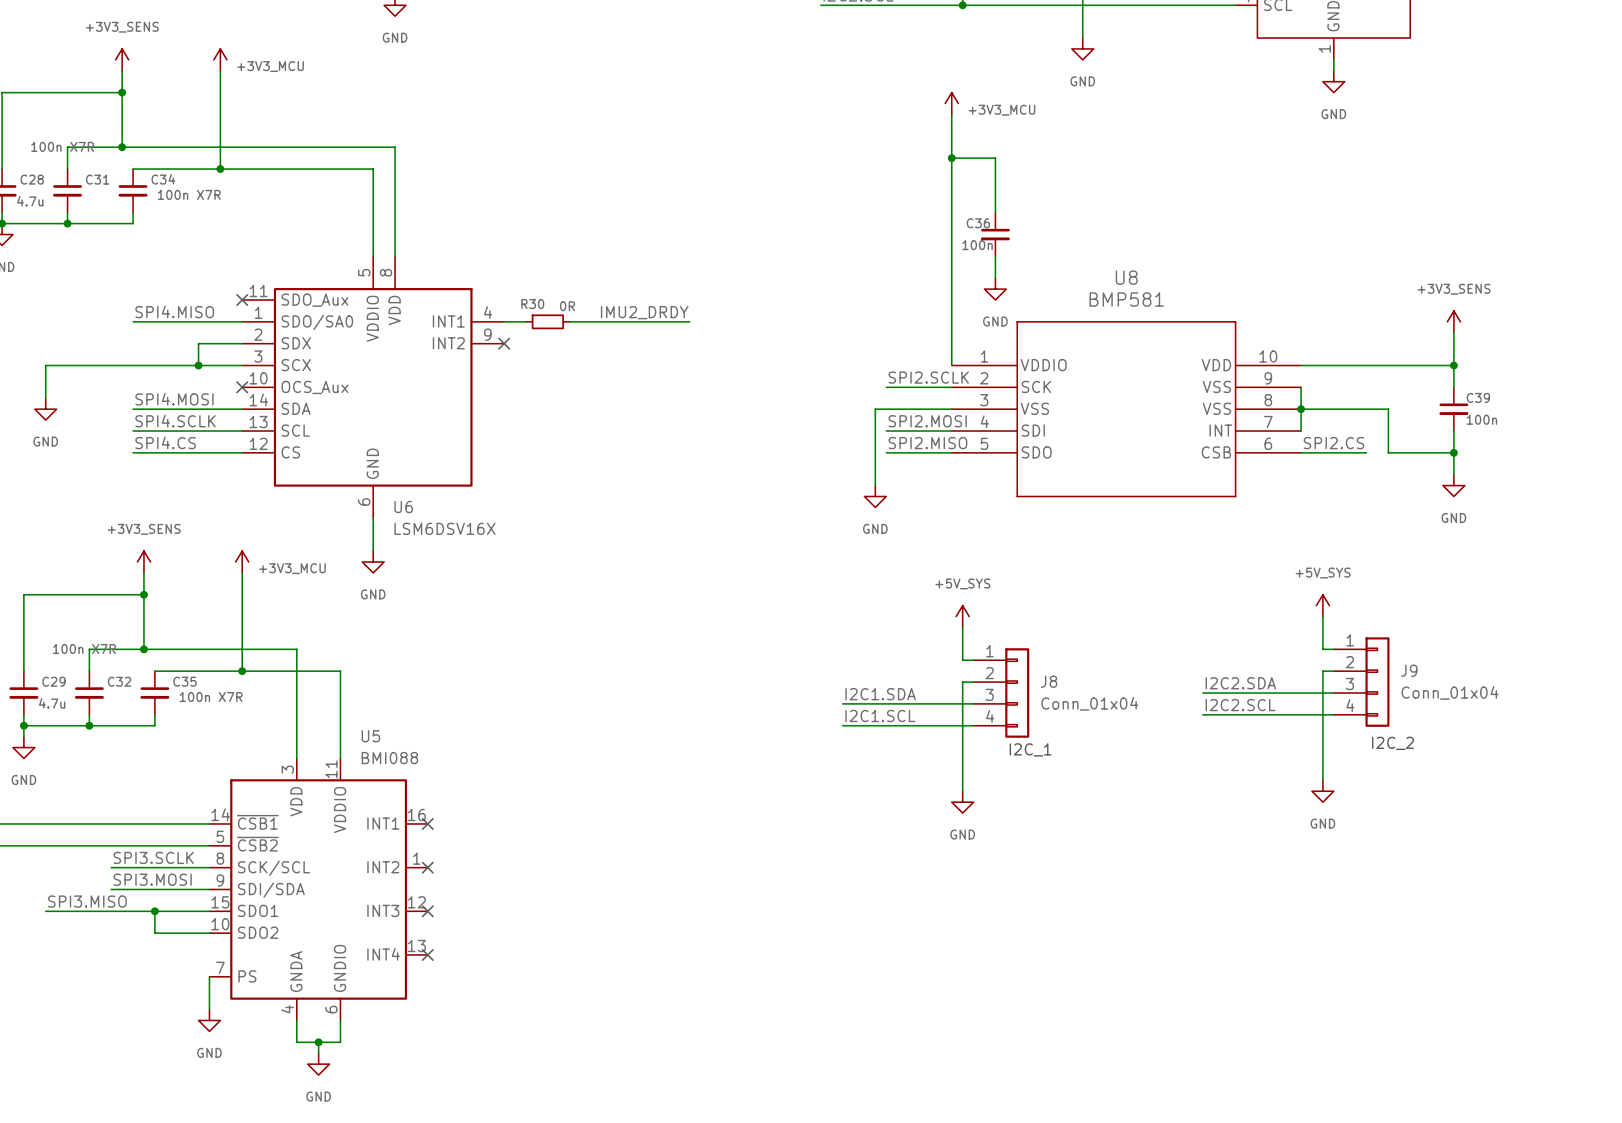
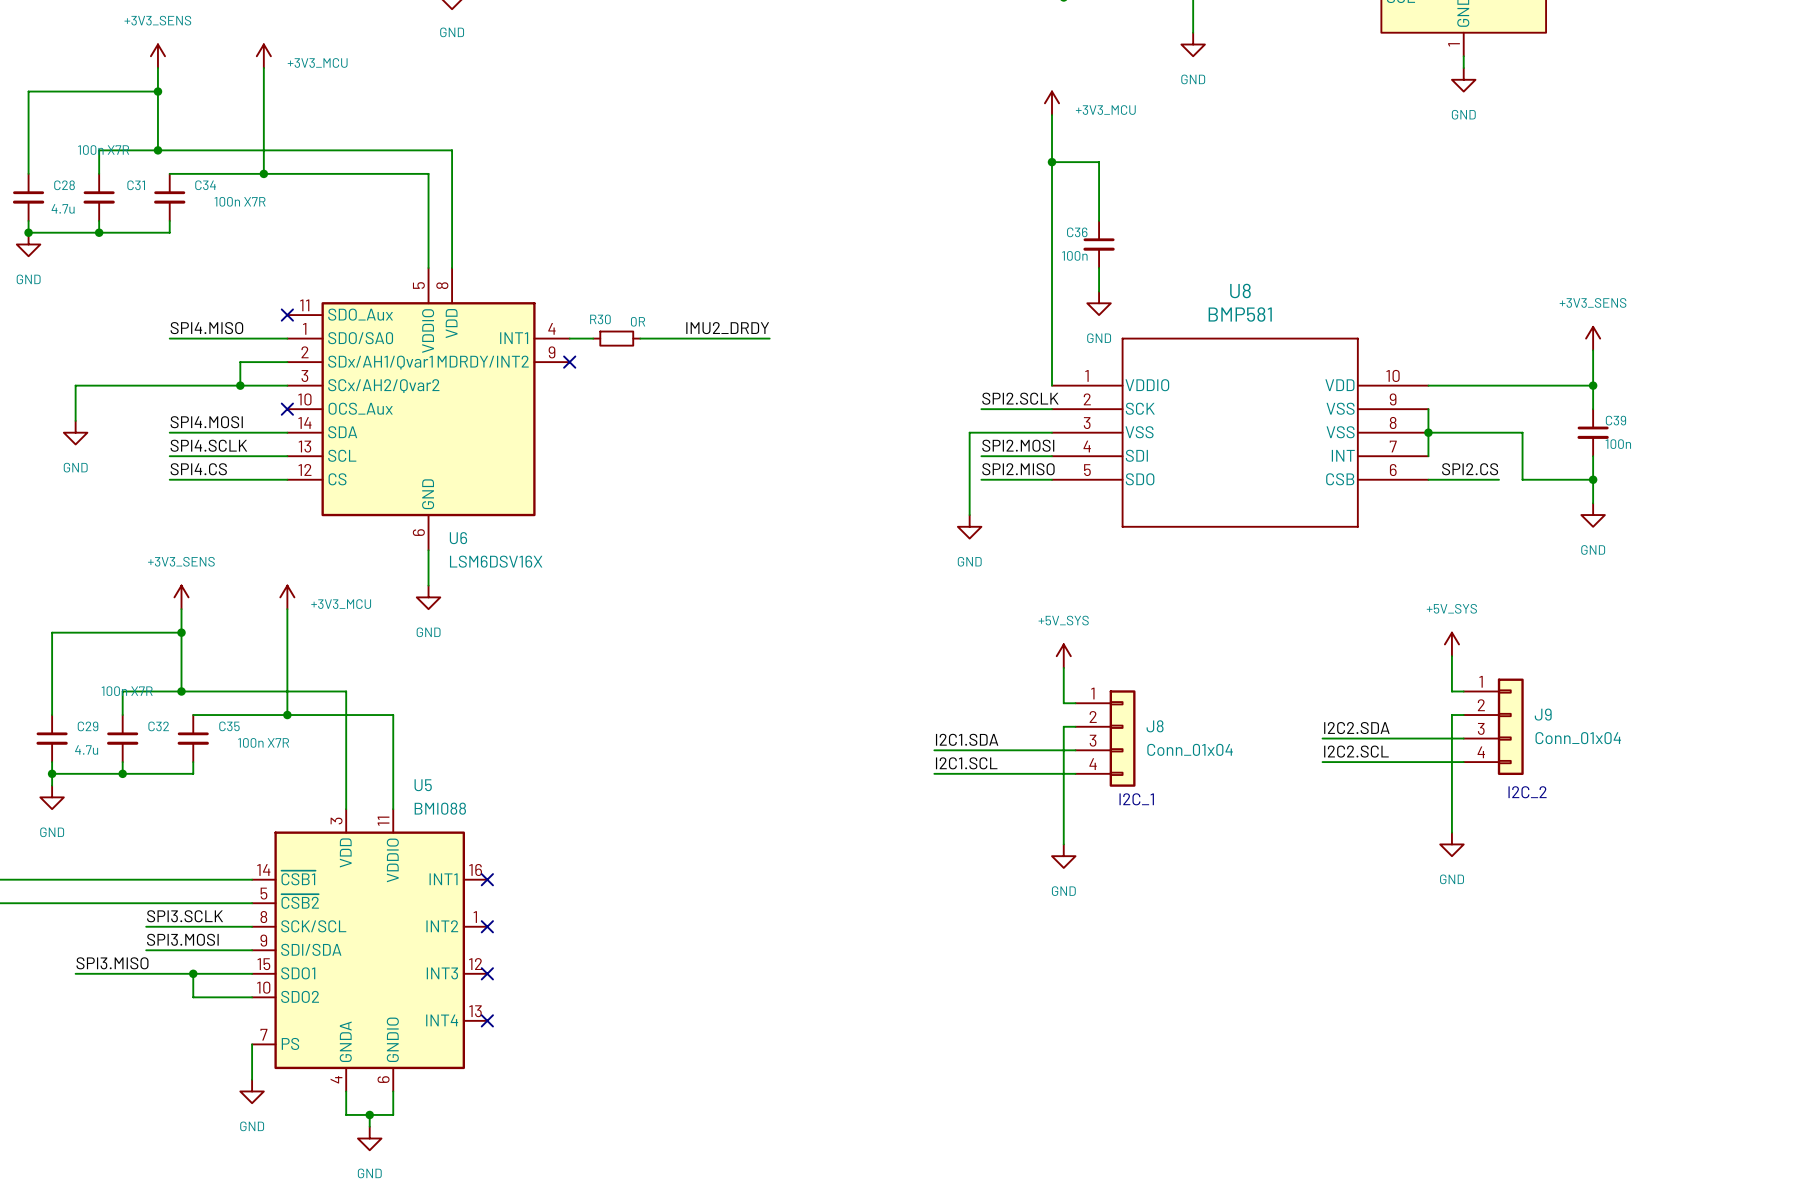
U6 pin name: SDX (296, 343) -> SDx/AH1/Qvar1 (380, 362)
U6 pin name: INT2 (448, 343) -> MDRDY/INT2 (483, 361)
U6 pin name: SCX (296, 365) -> SCx/AH2/Qvar2 (383, 386)

